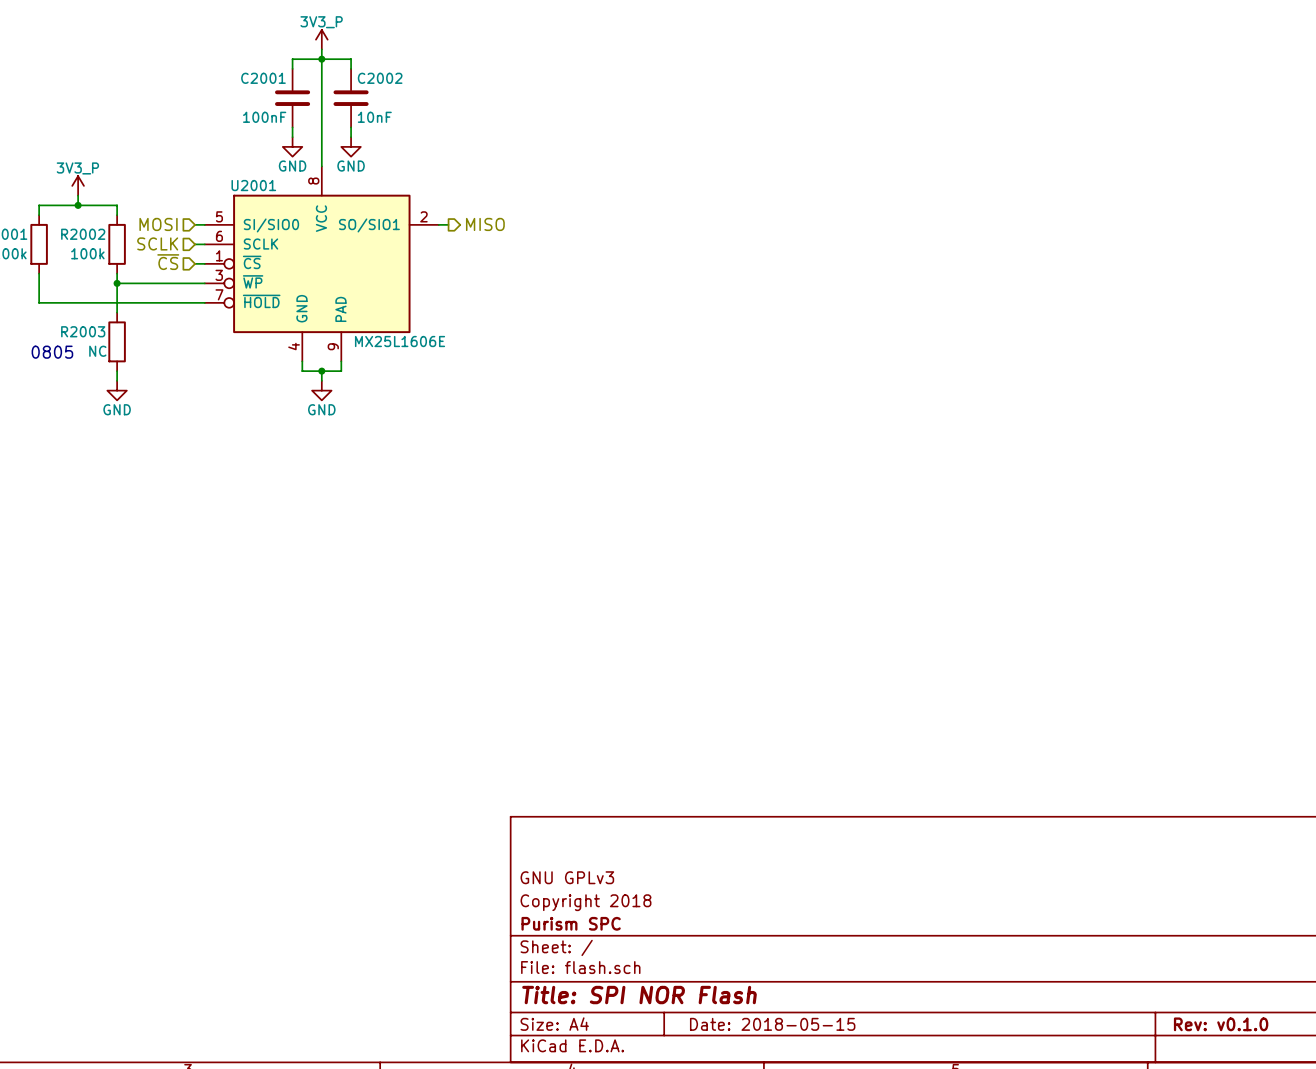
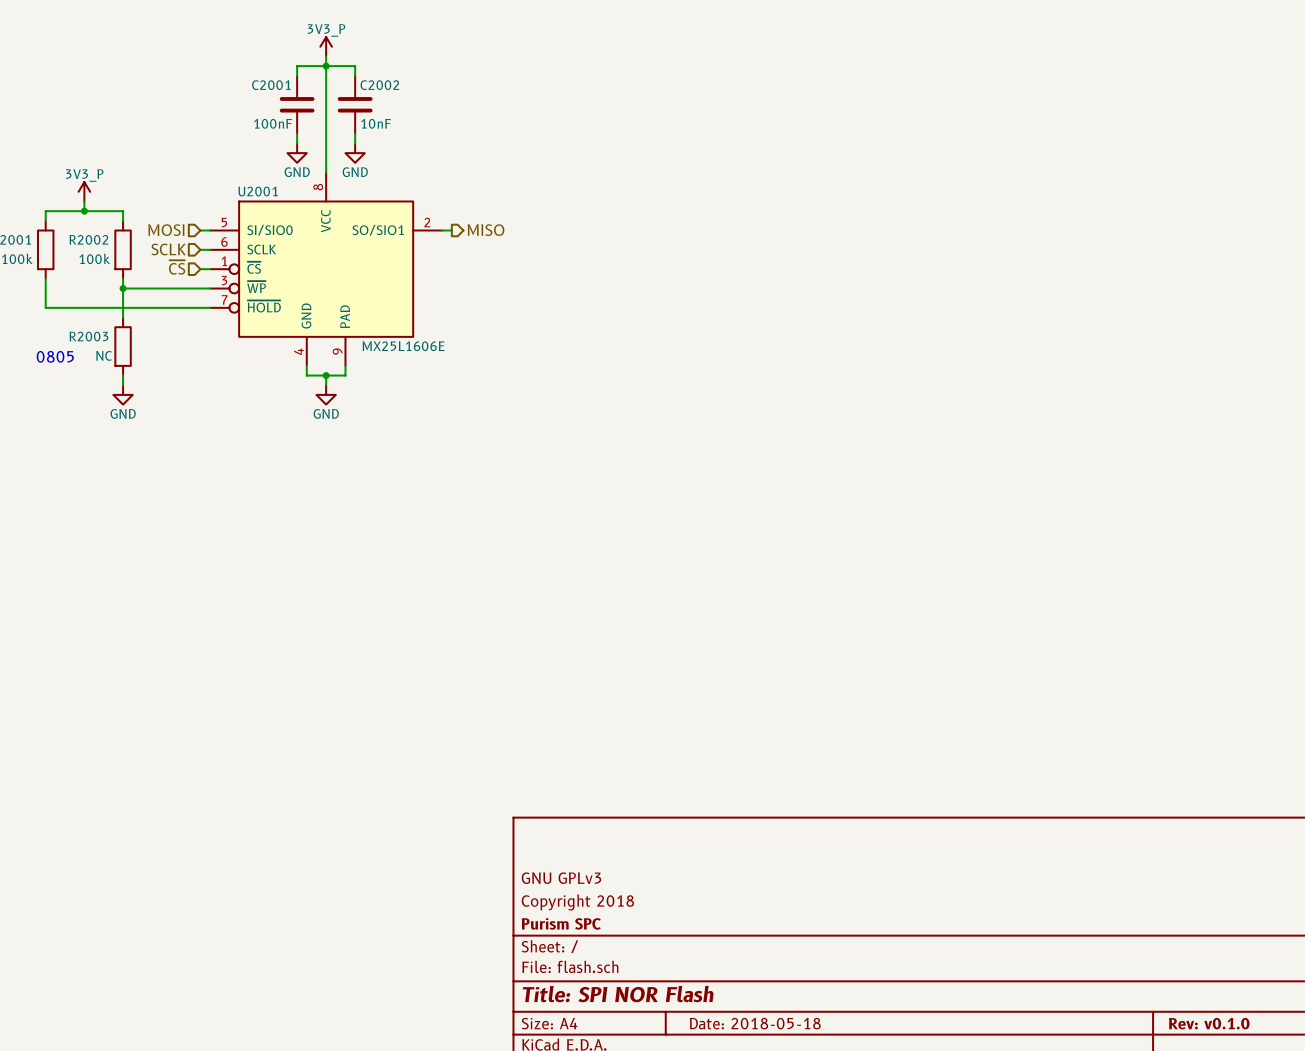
title block: Date: 2018-05-15 (772, 1024) -> Date: 2018-05-18 (755, 1023)

